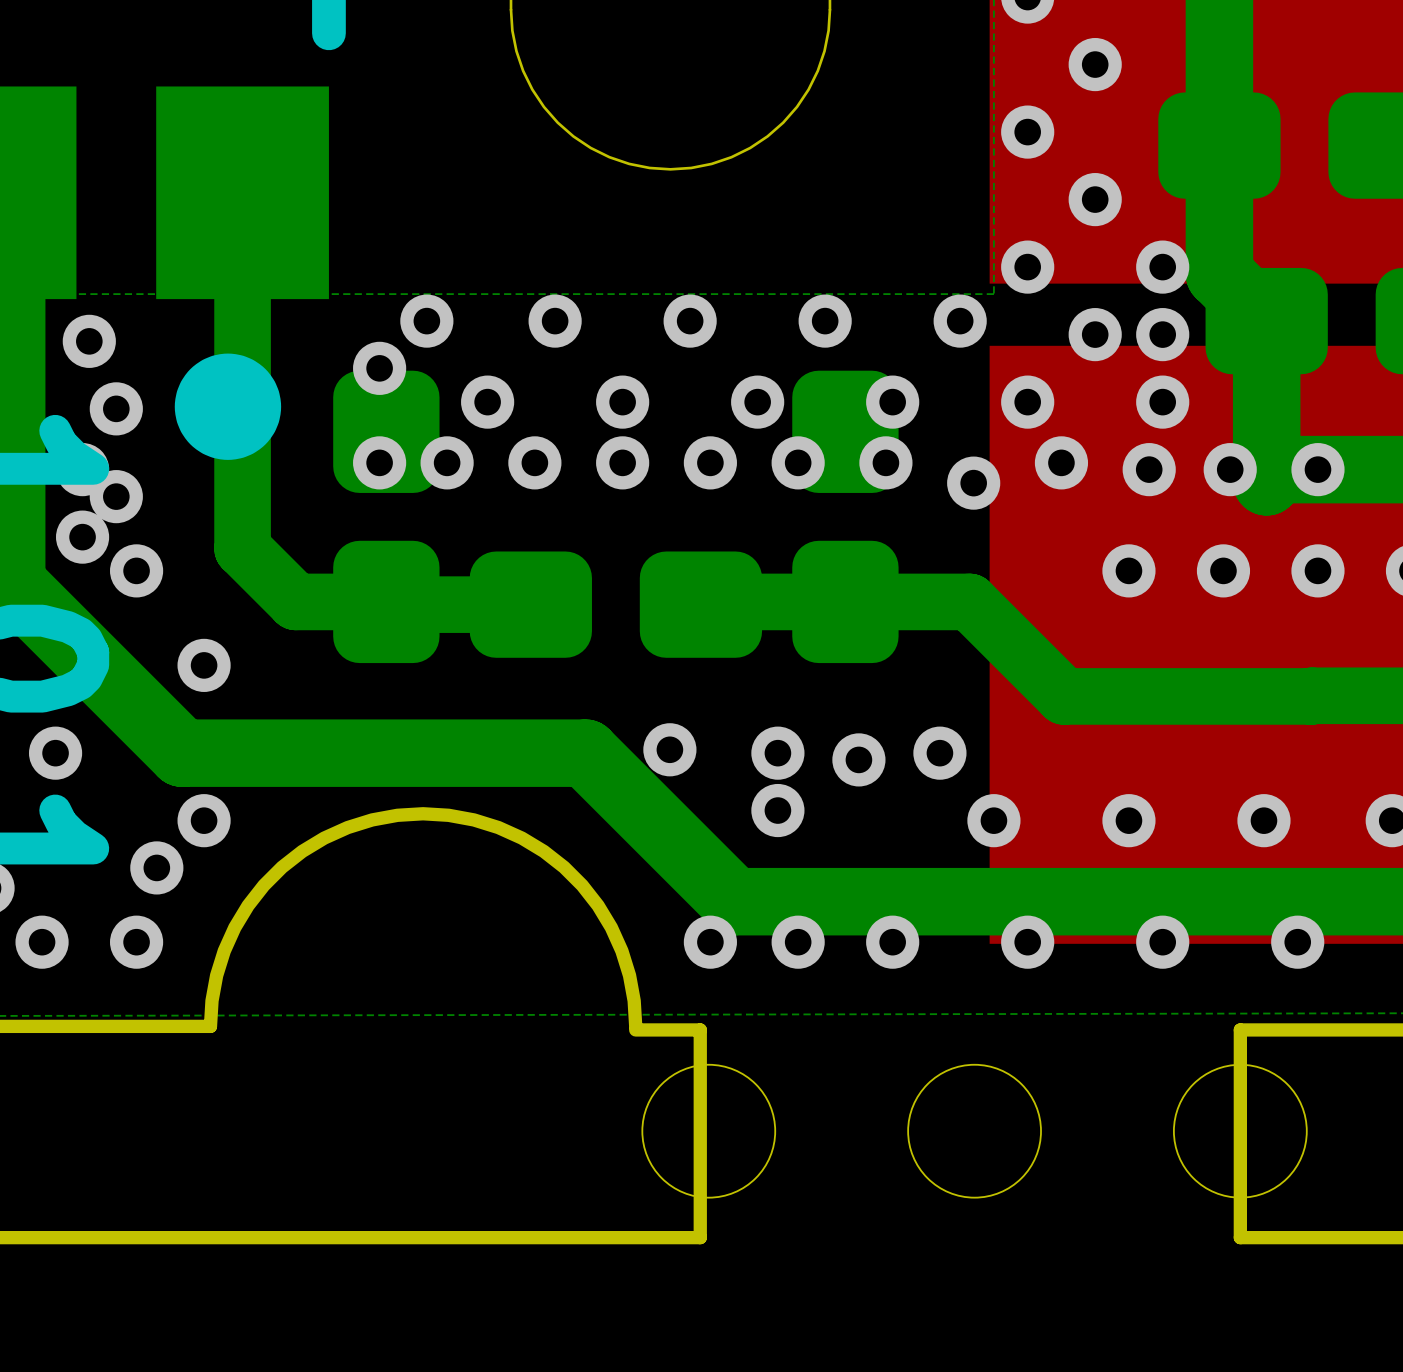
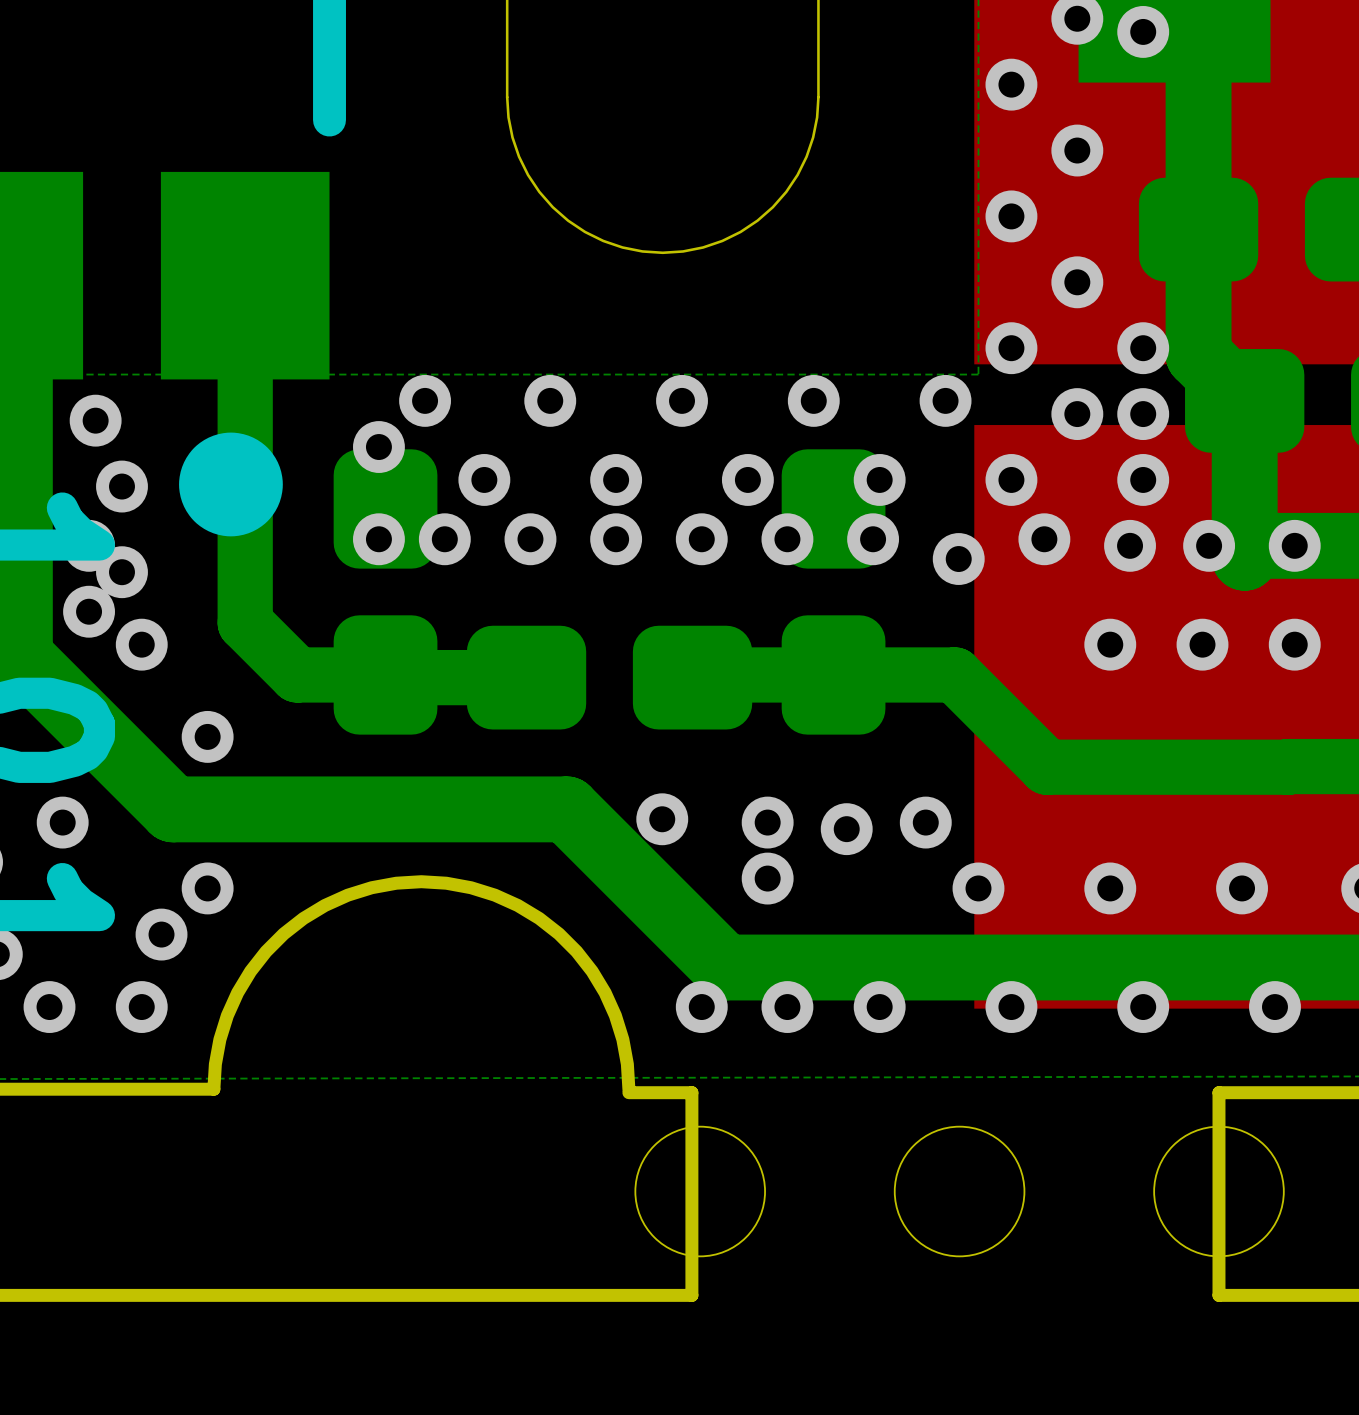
bottom track: (168, 739) (182, 753) (585, 753) -> (173, 809) (566, 809) (579, 822)

